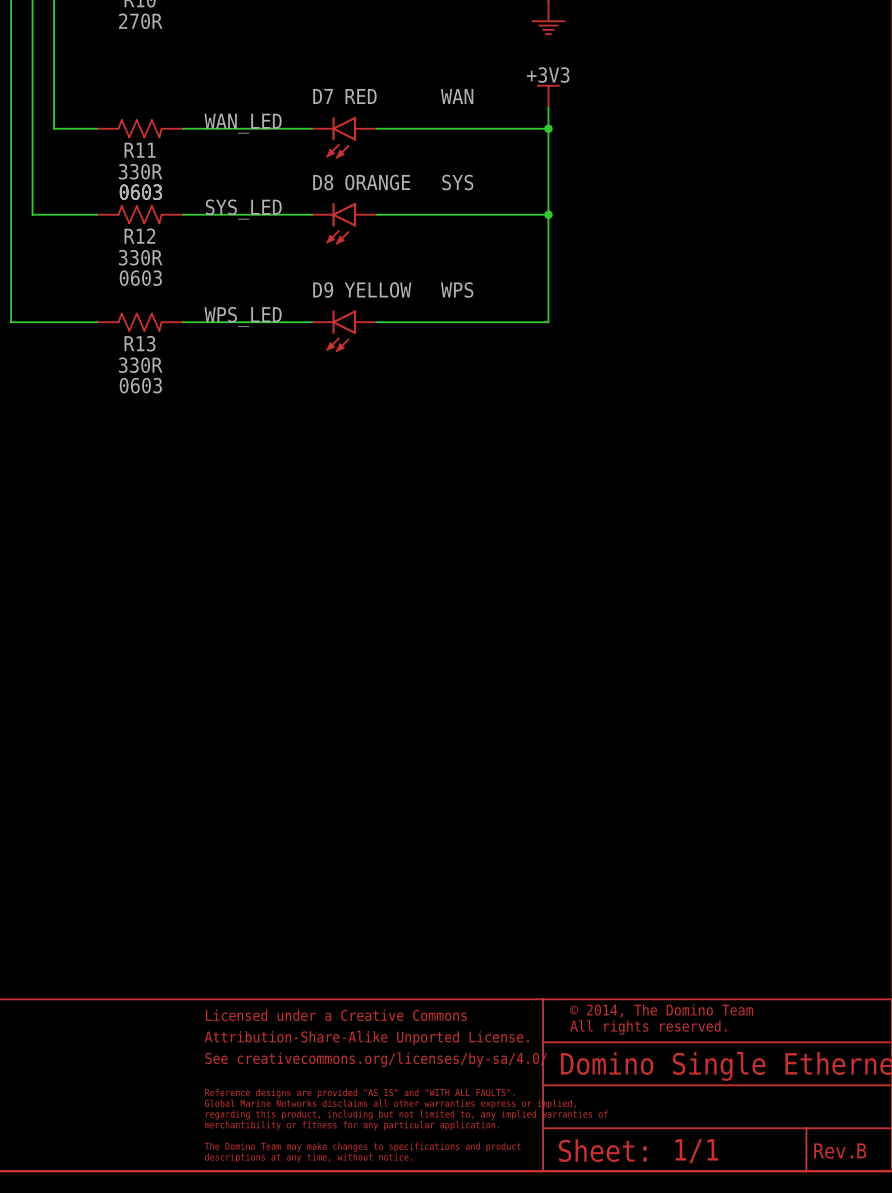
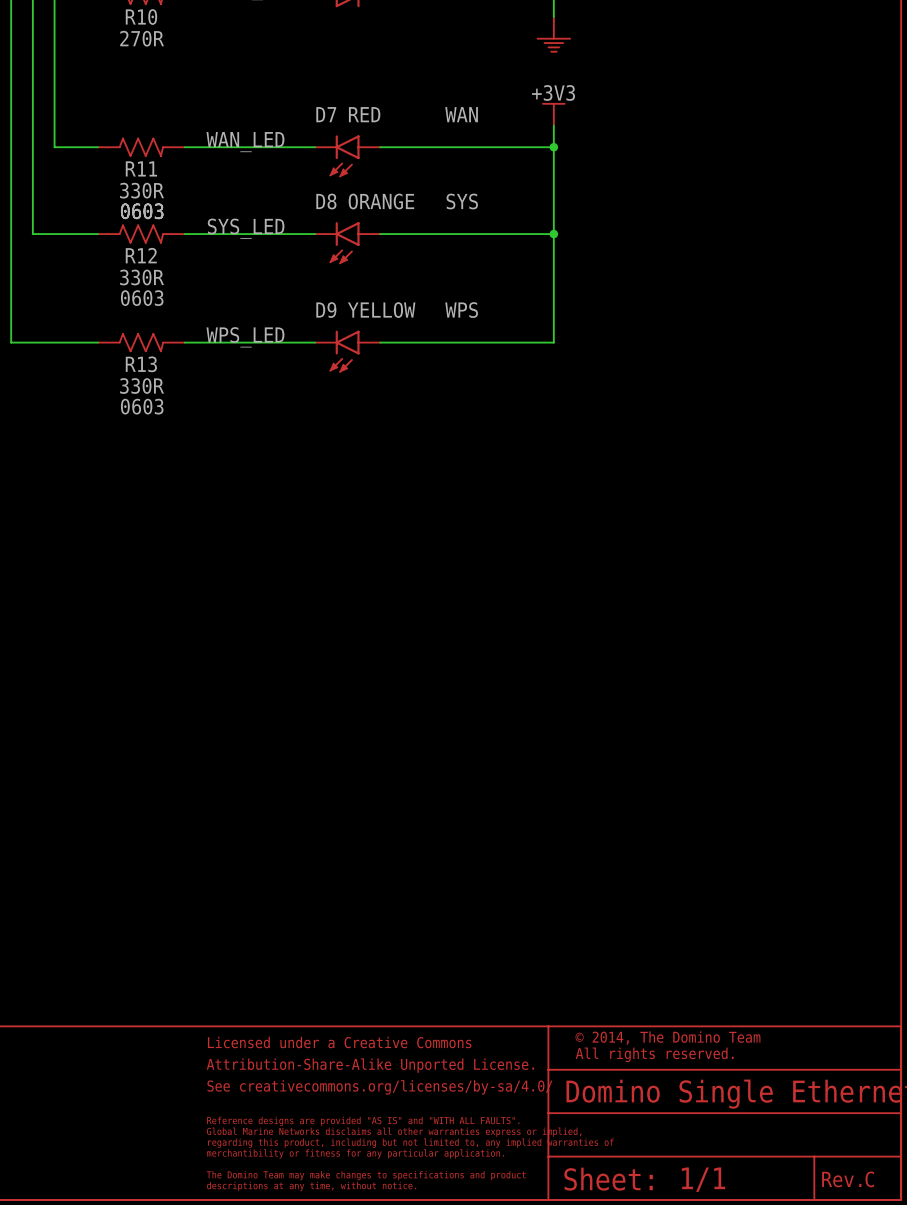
text: B (861, 1150) -> C (869, 1179)

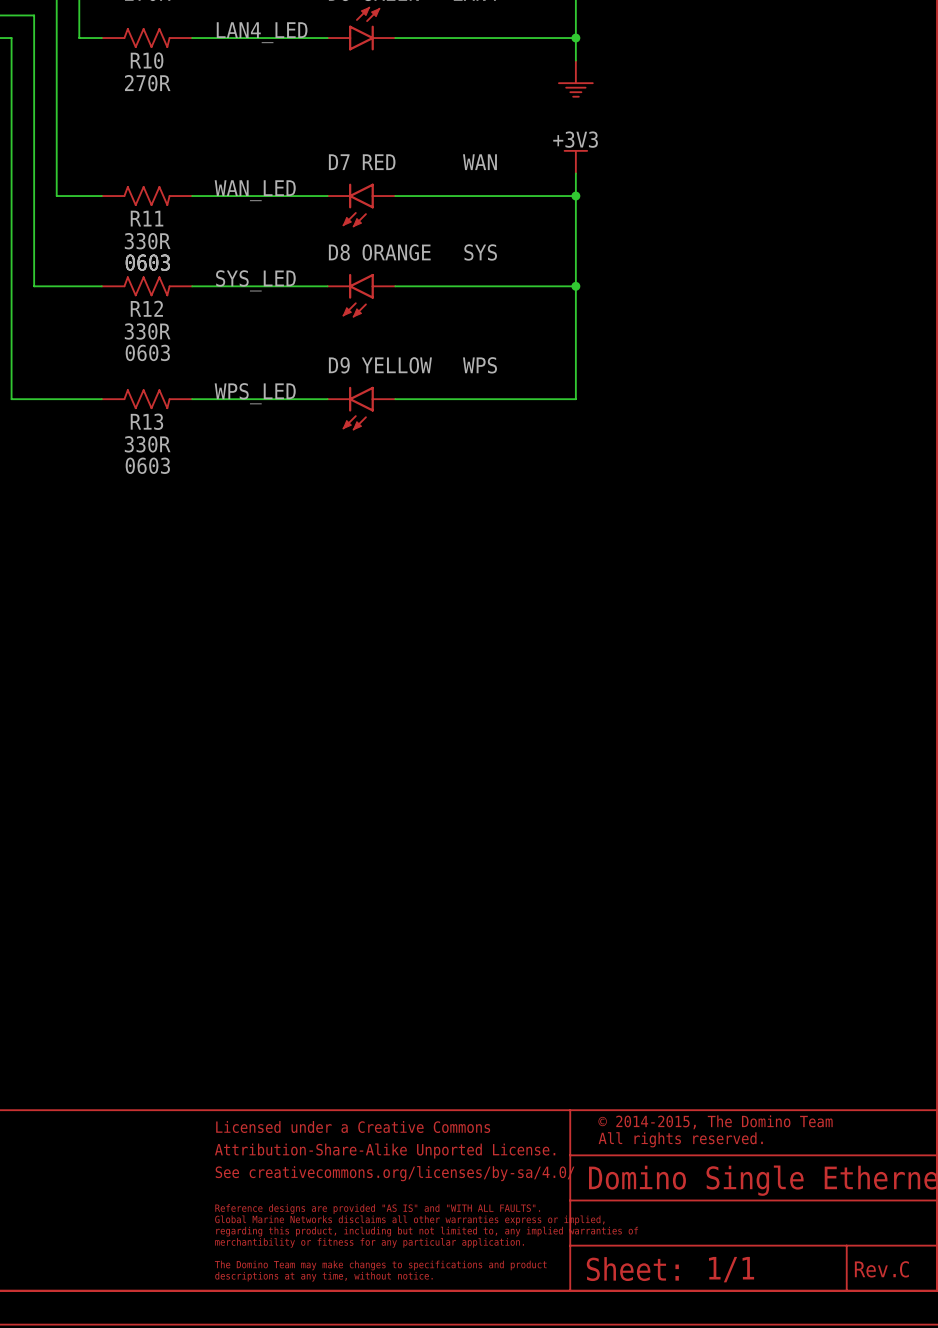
text: © 2014, The Domino Team (667, 1038) -> © 2014-2015, The Domino Team (715, 1122)

